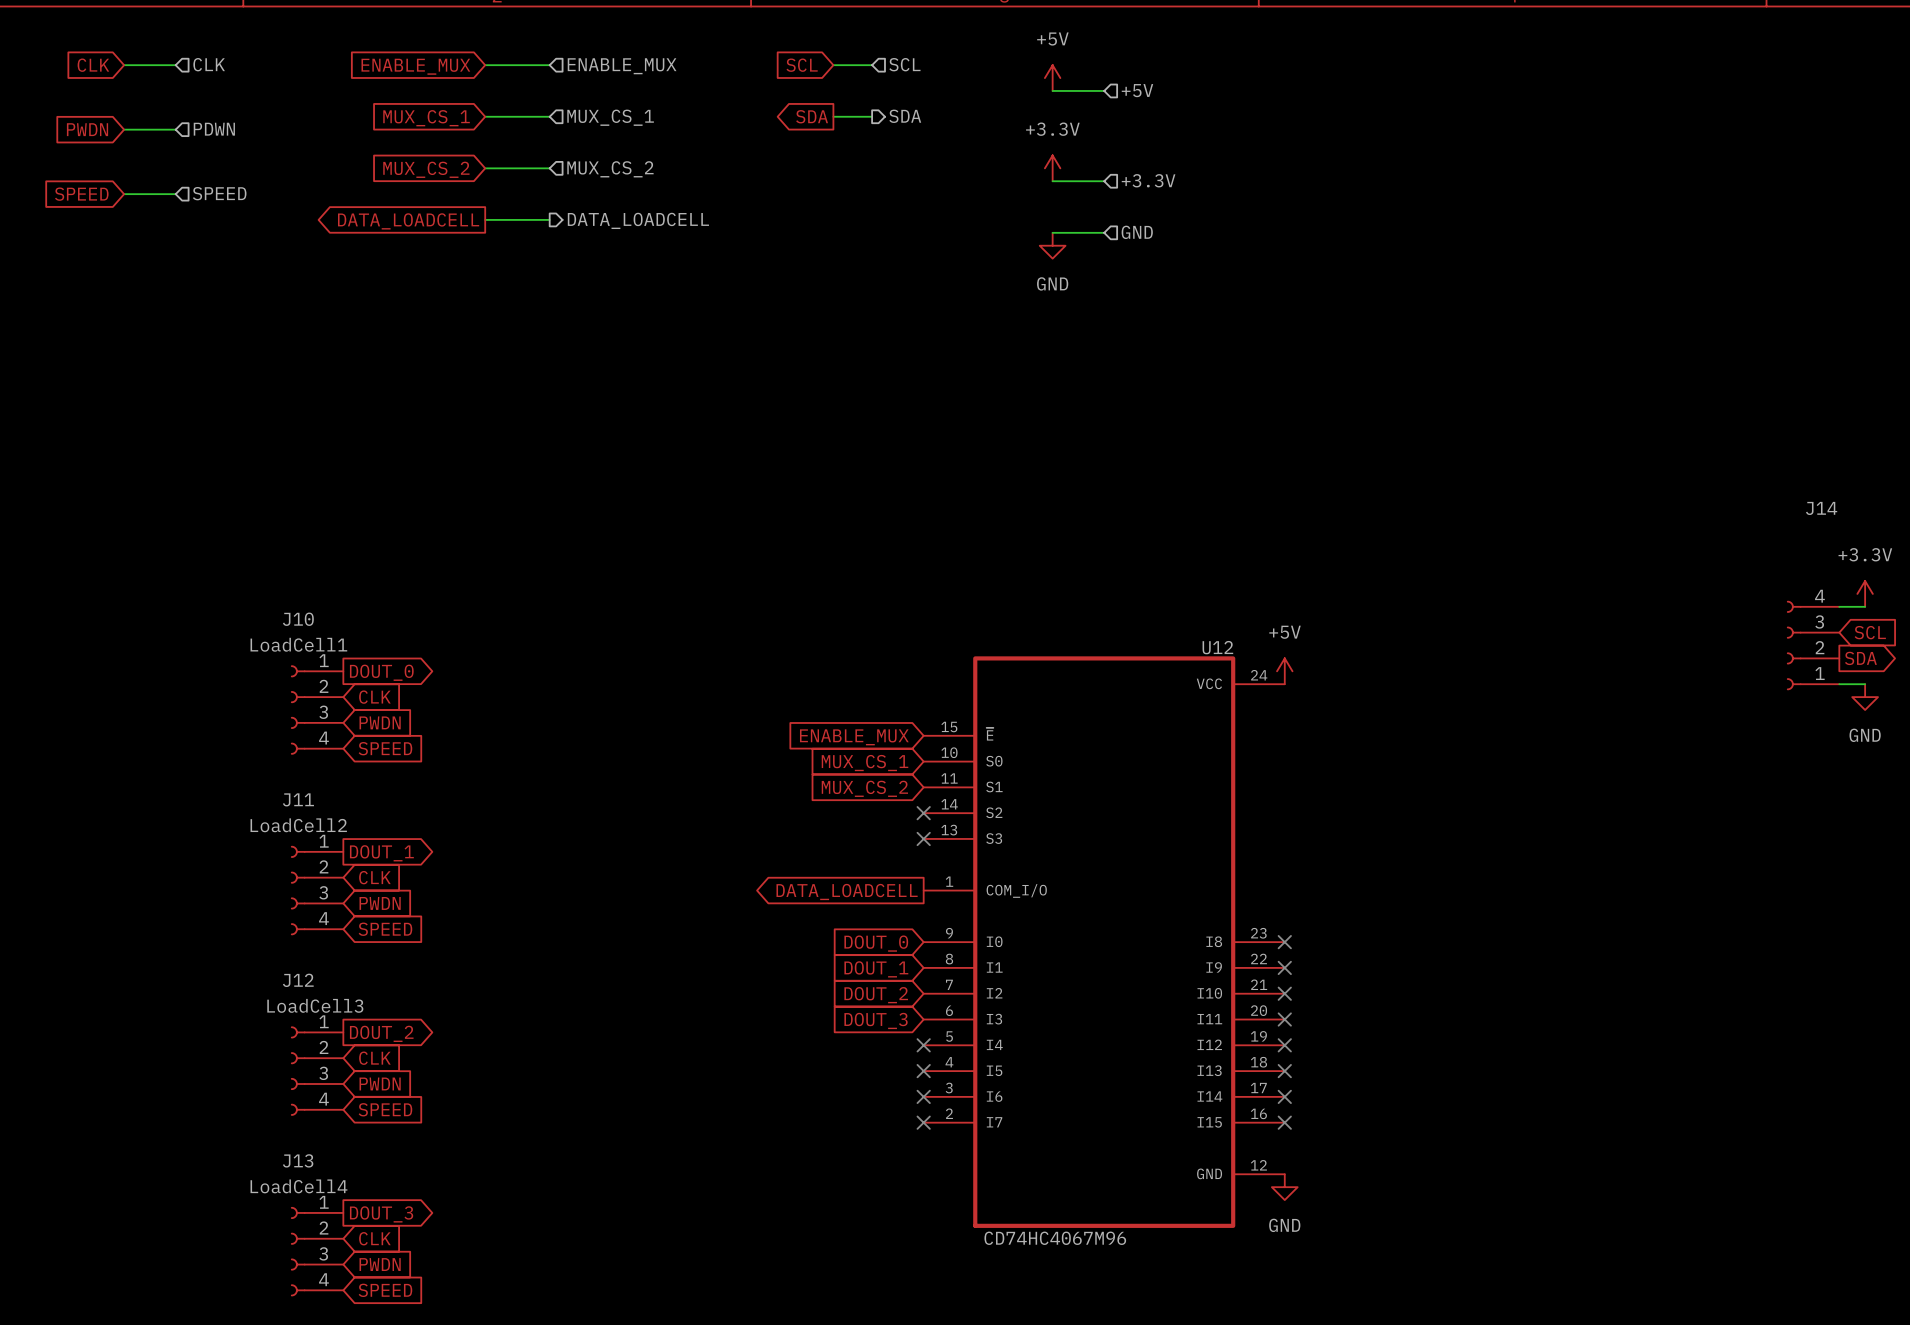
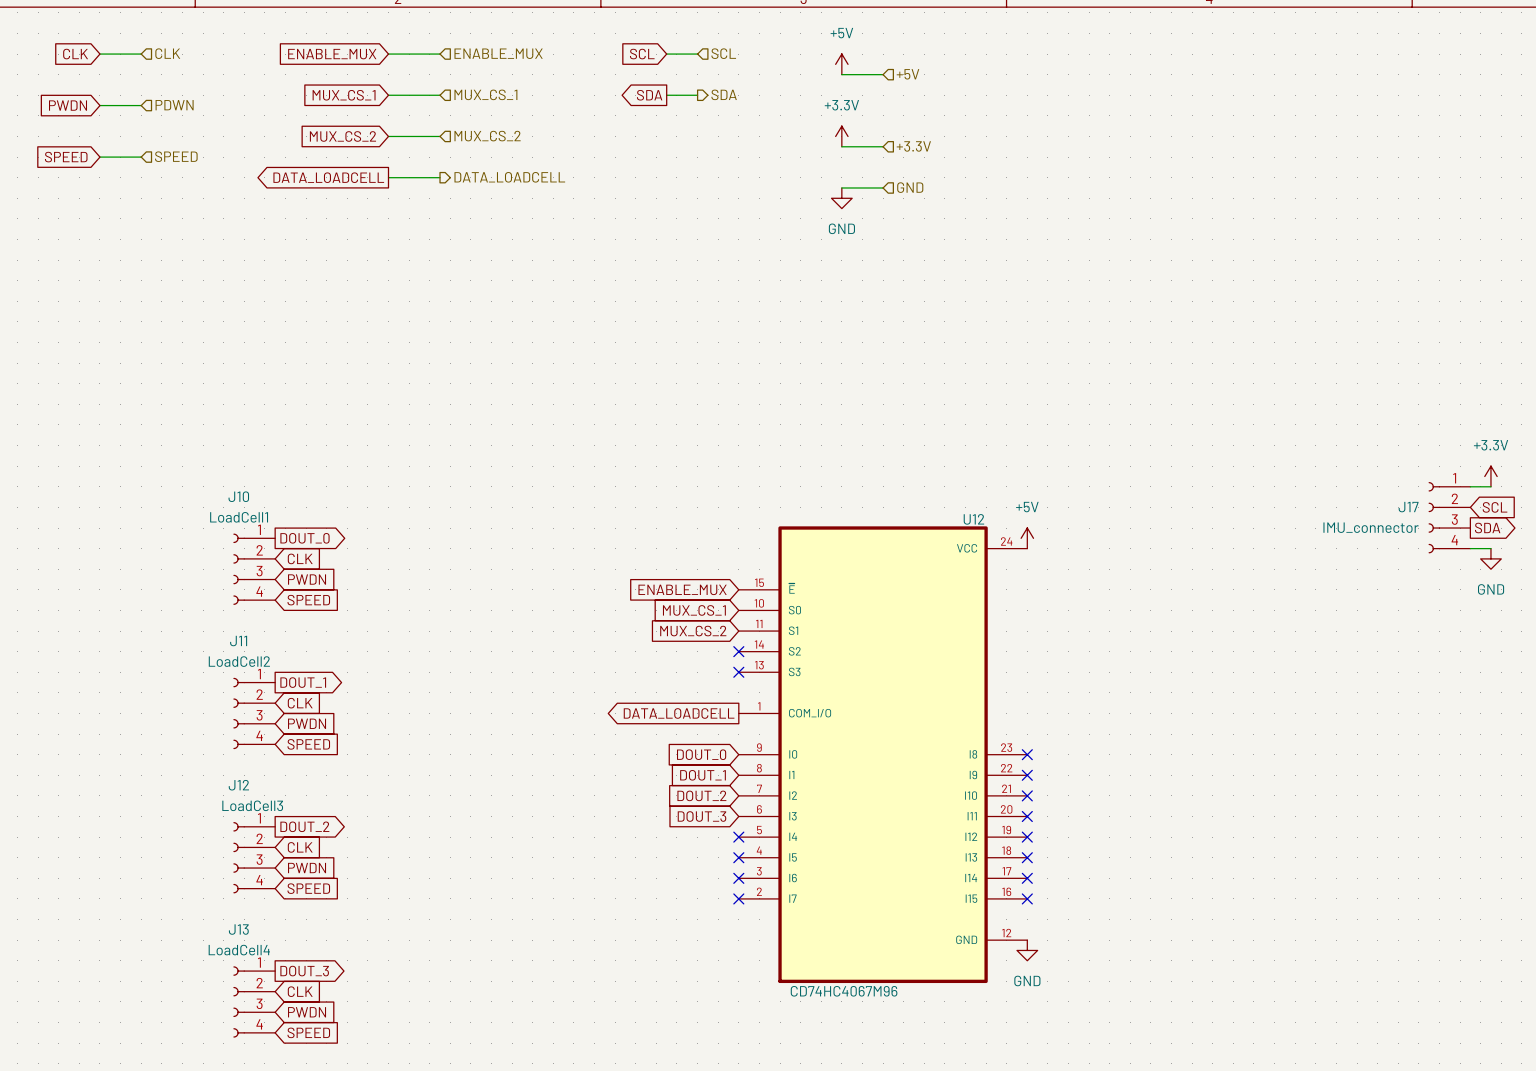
J14 name: J14 (1821, 508) -> J17 (1408, 507)
J14 flip: as is (1794, 645) -> up-down (1434, 517)
J14 value: none -> IMU_connector (1371, 527)

